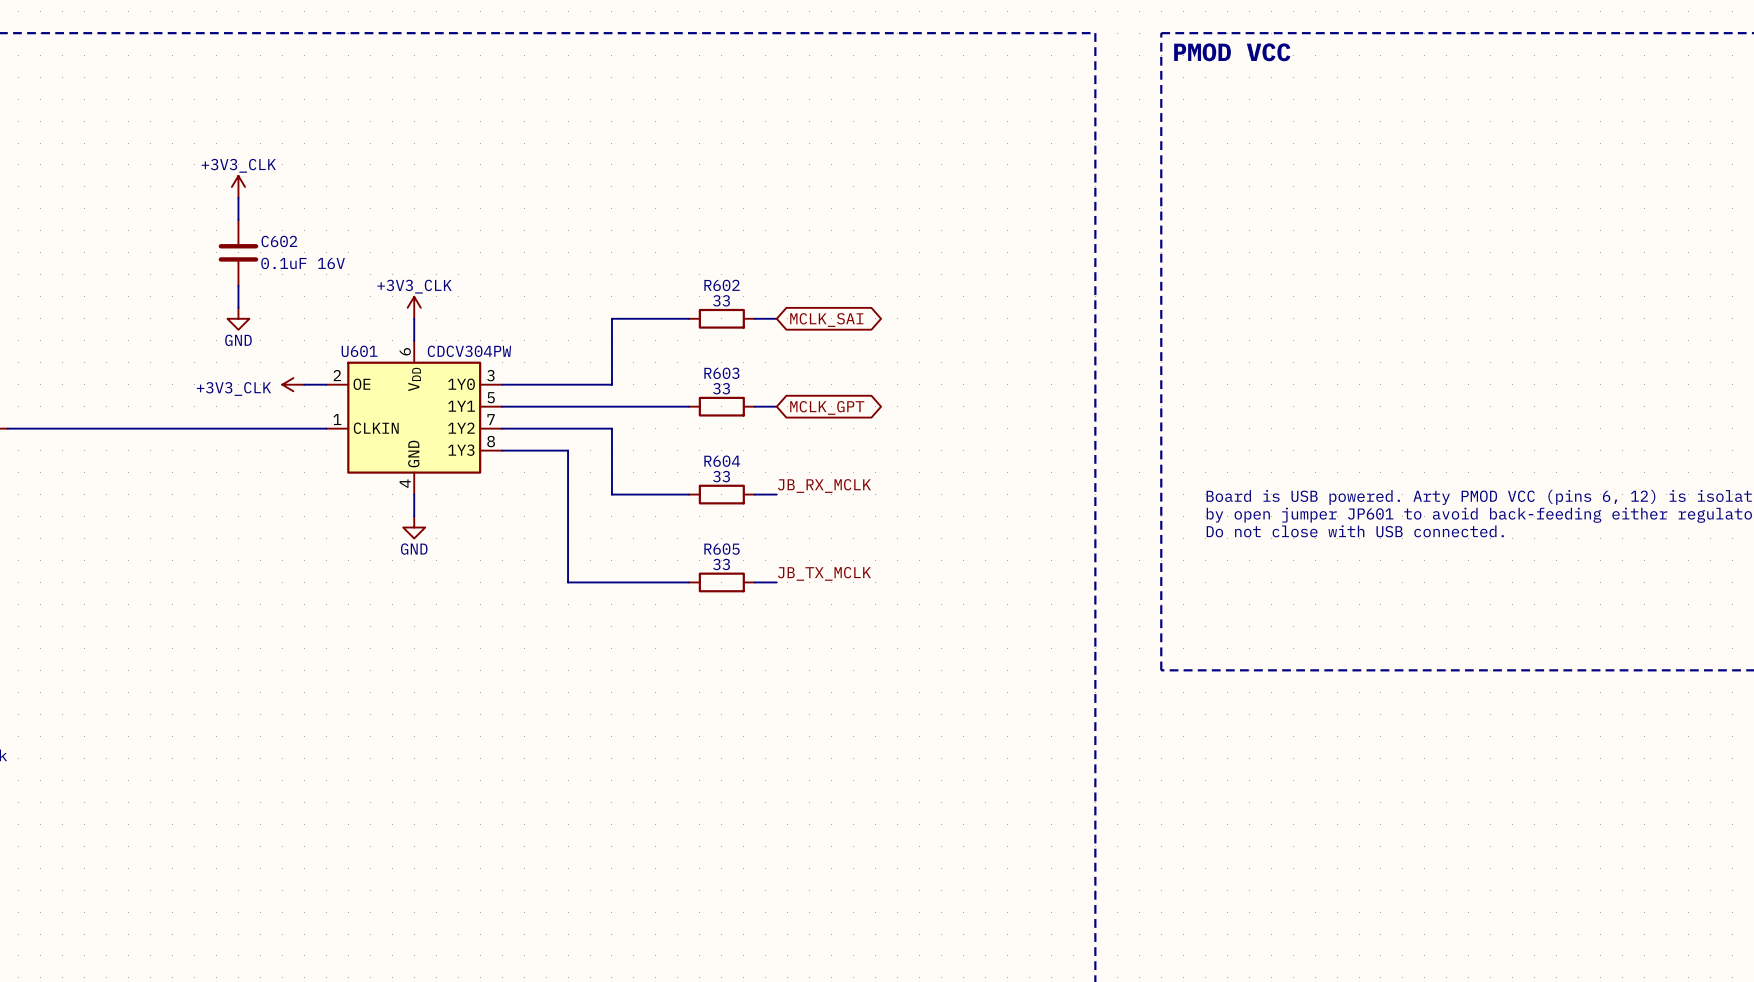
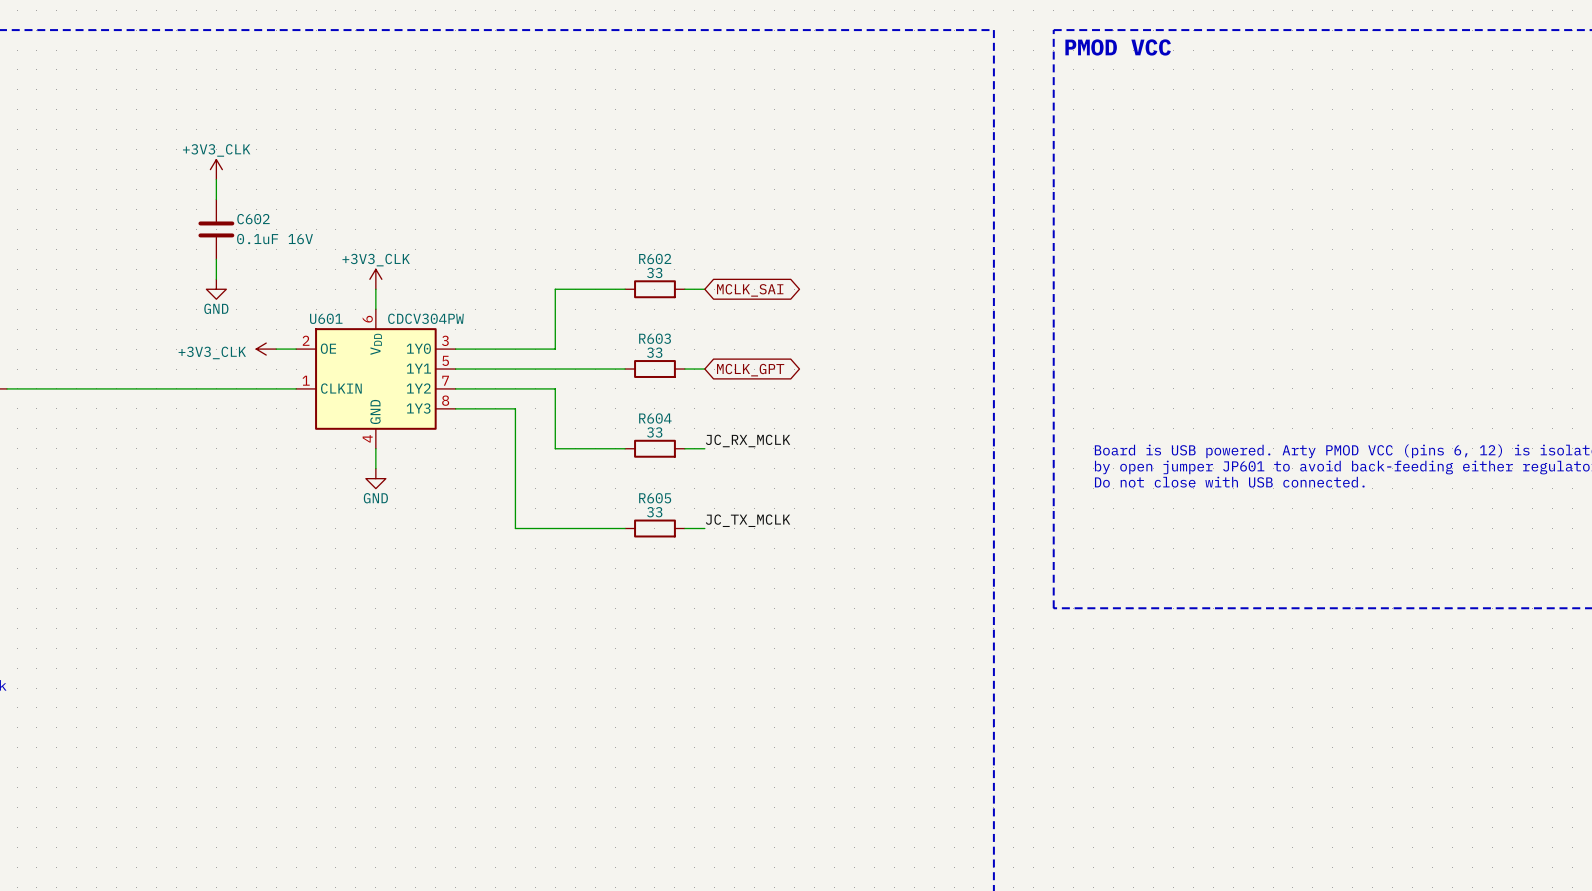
label: JB_RX_MCLK (824, 485) -> JC_RX_MCLK (748, 440)
label: JB_TX_MCLK (824, 573) -> JC_TX_MCLK (748, 520)

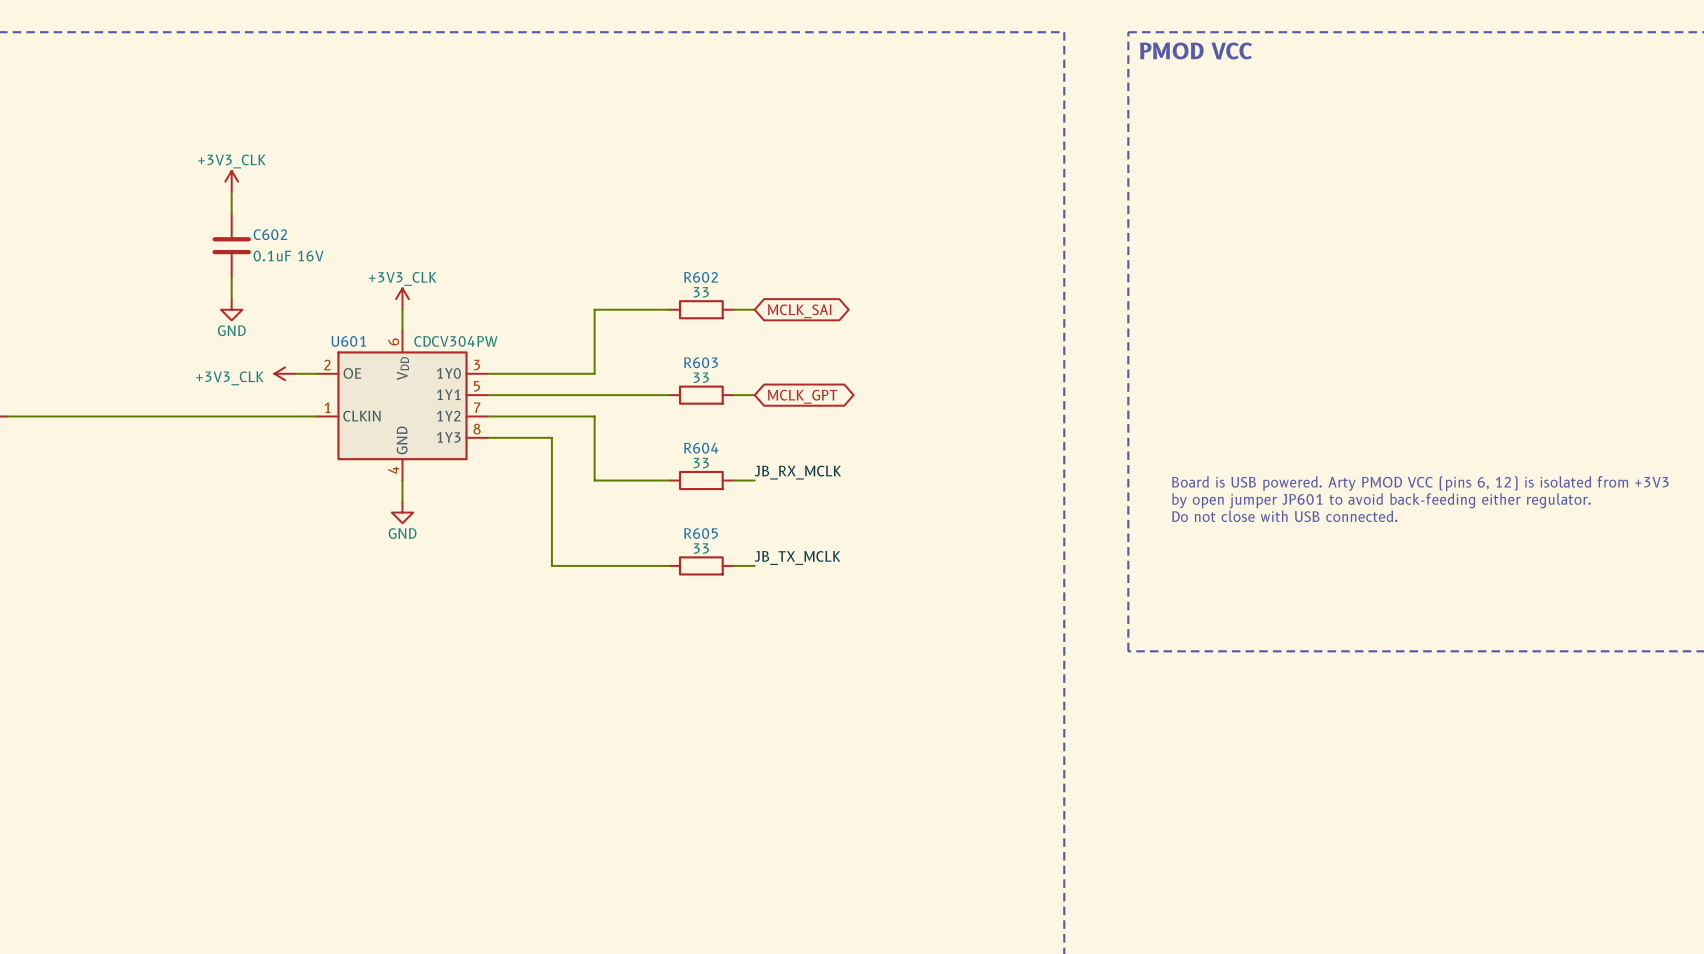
label: JC_RX_MCLK (748, 440) -> JB_RX_MCLK (797, 472)
label: JC_TX_MCLK (748, 520) -> JB_TX_MCLK (797, 557)

